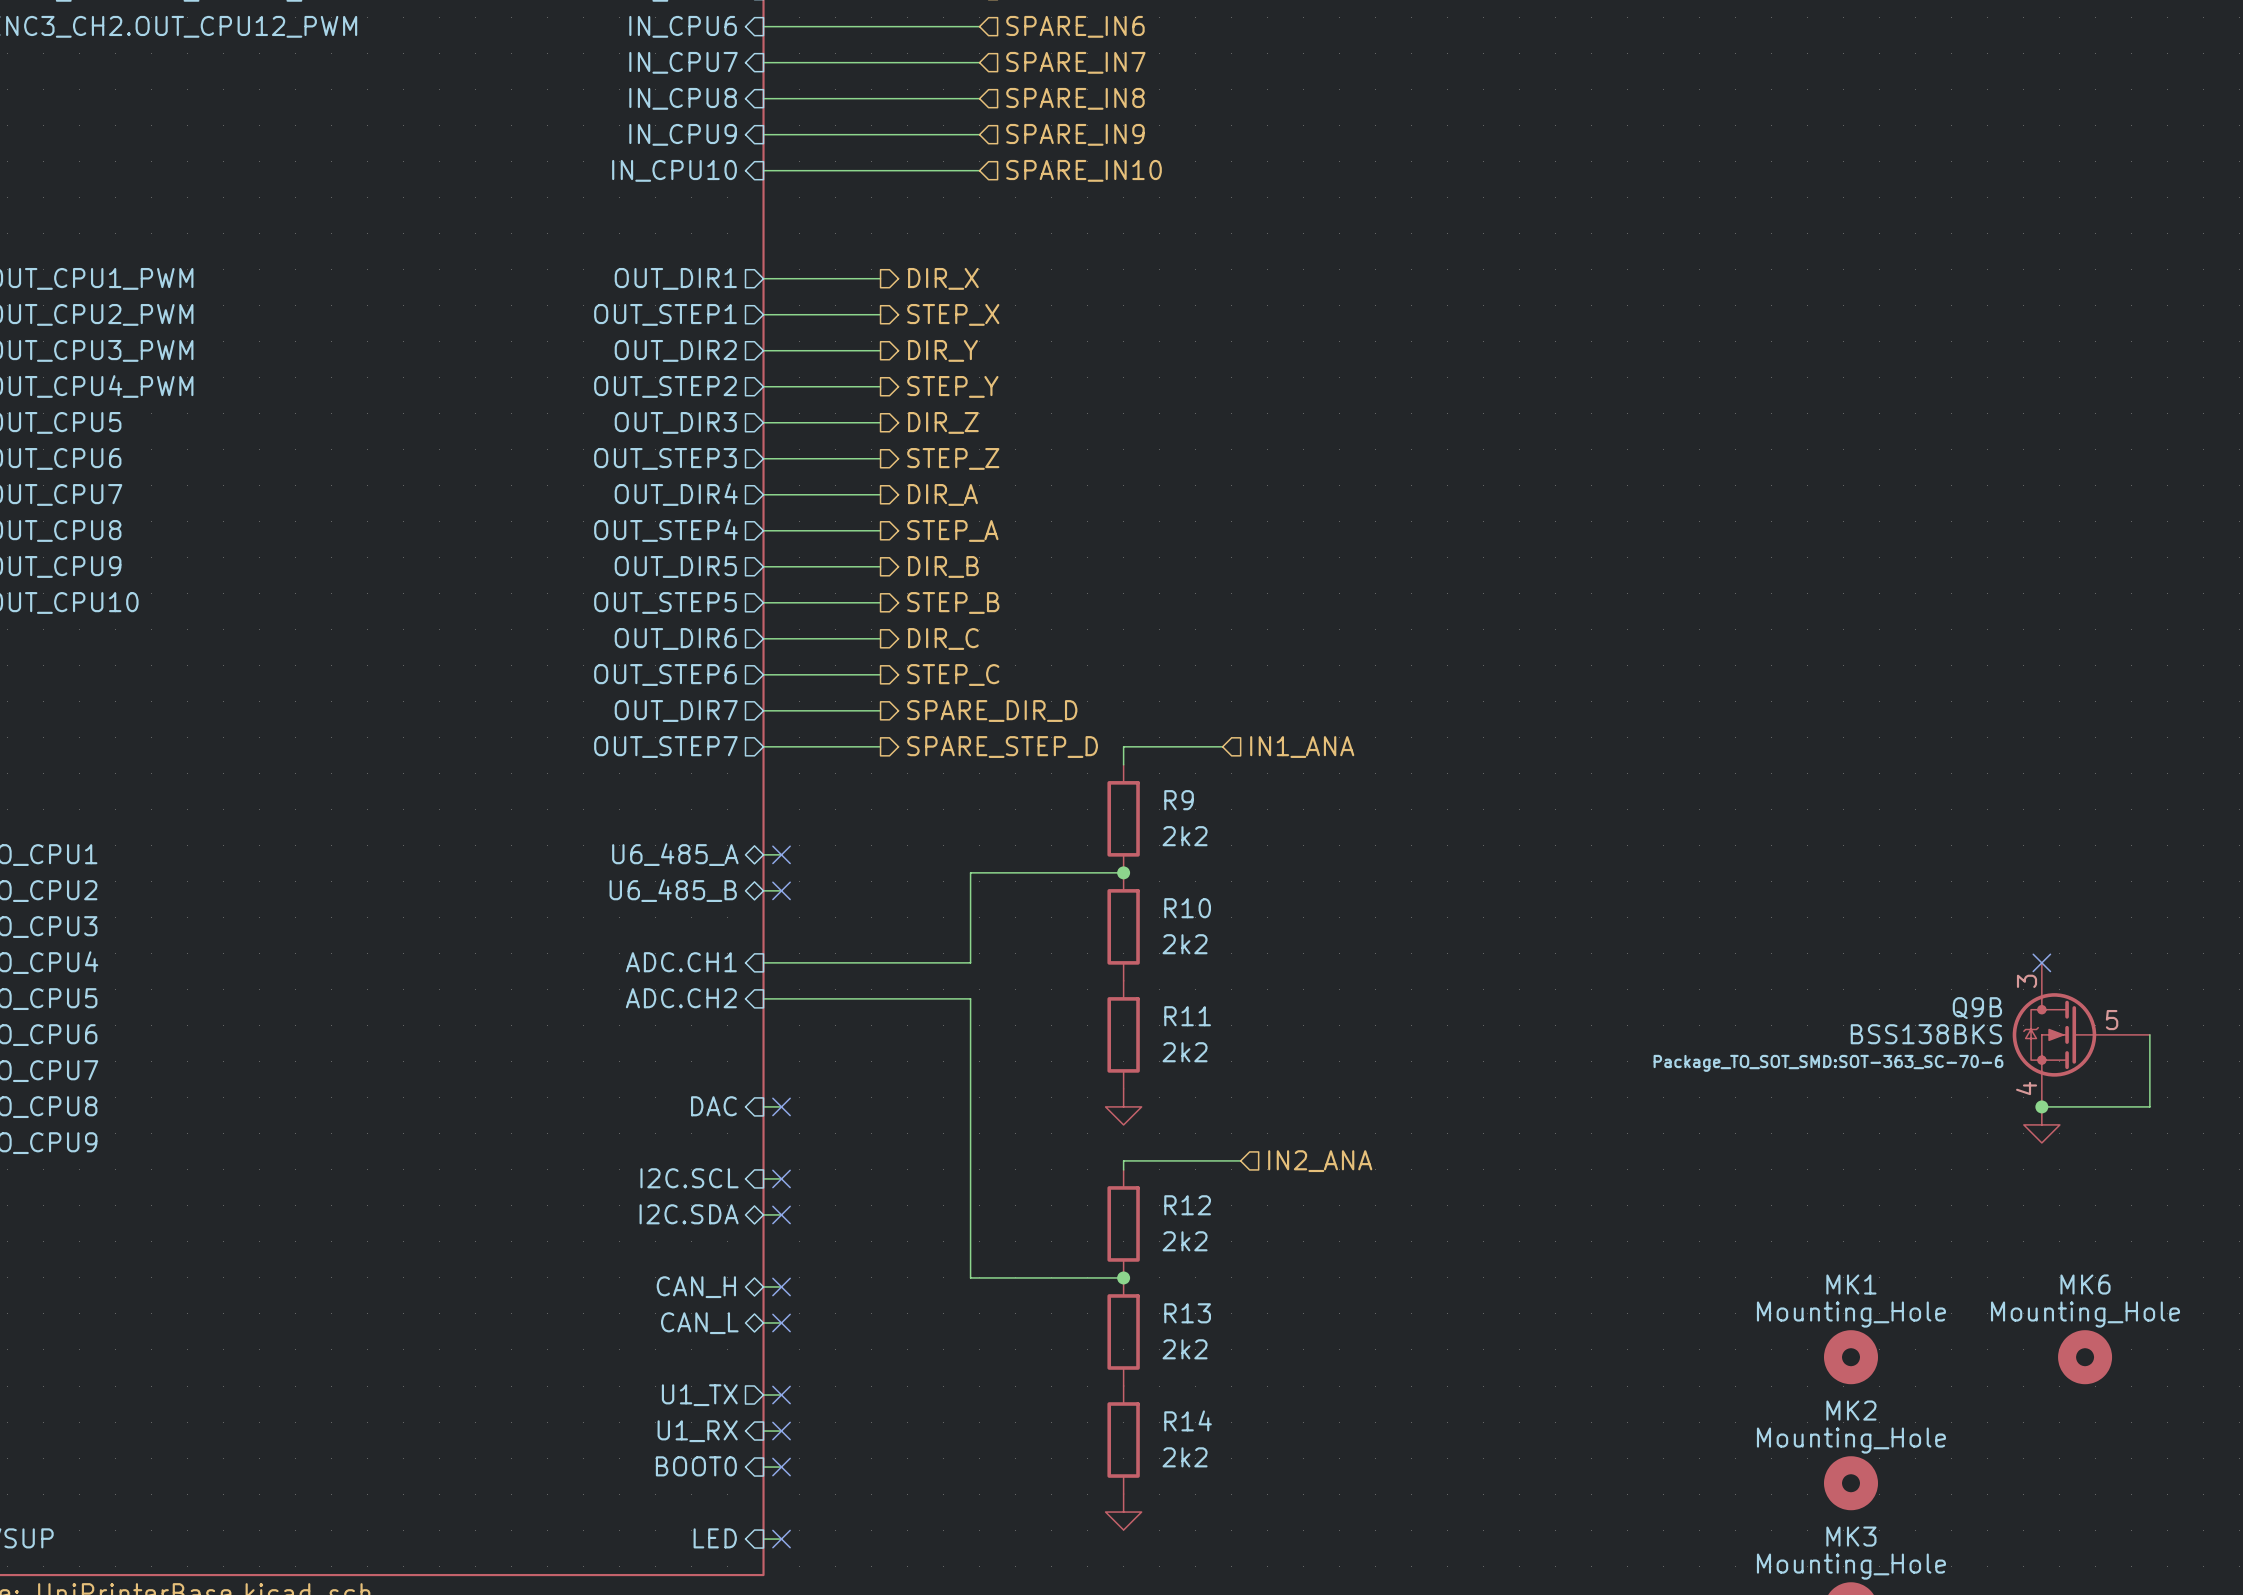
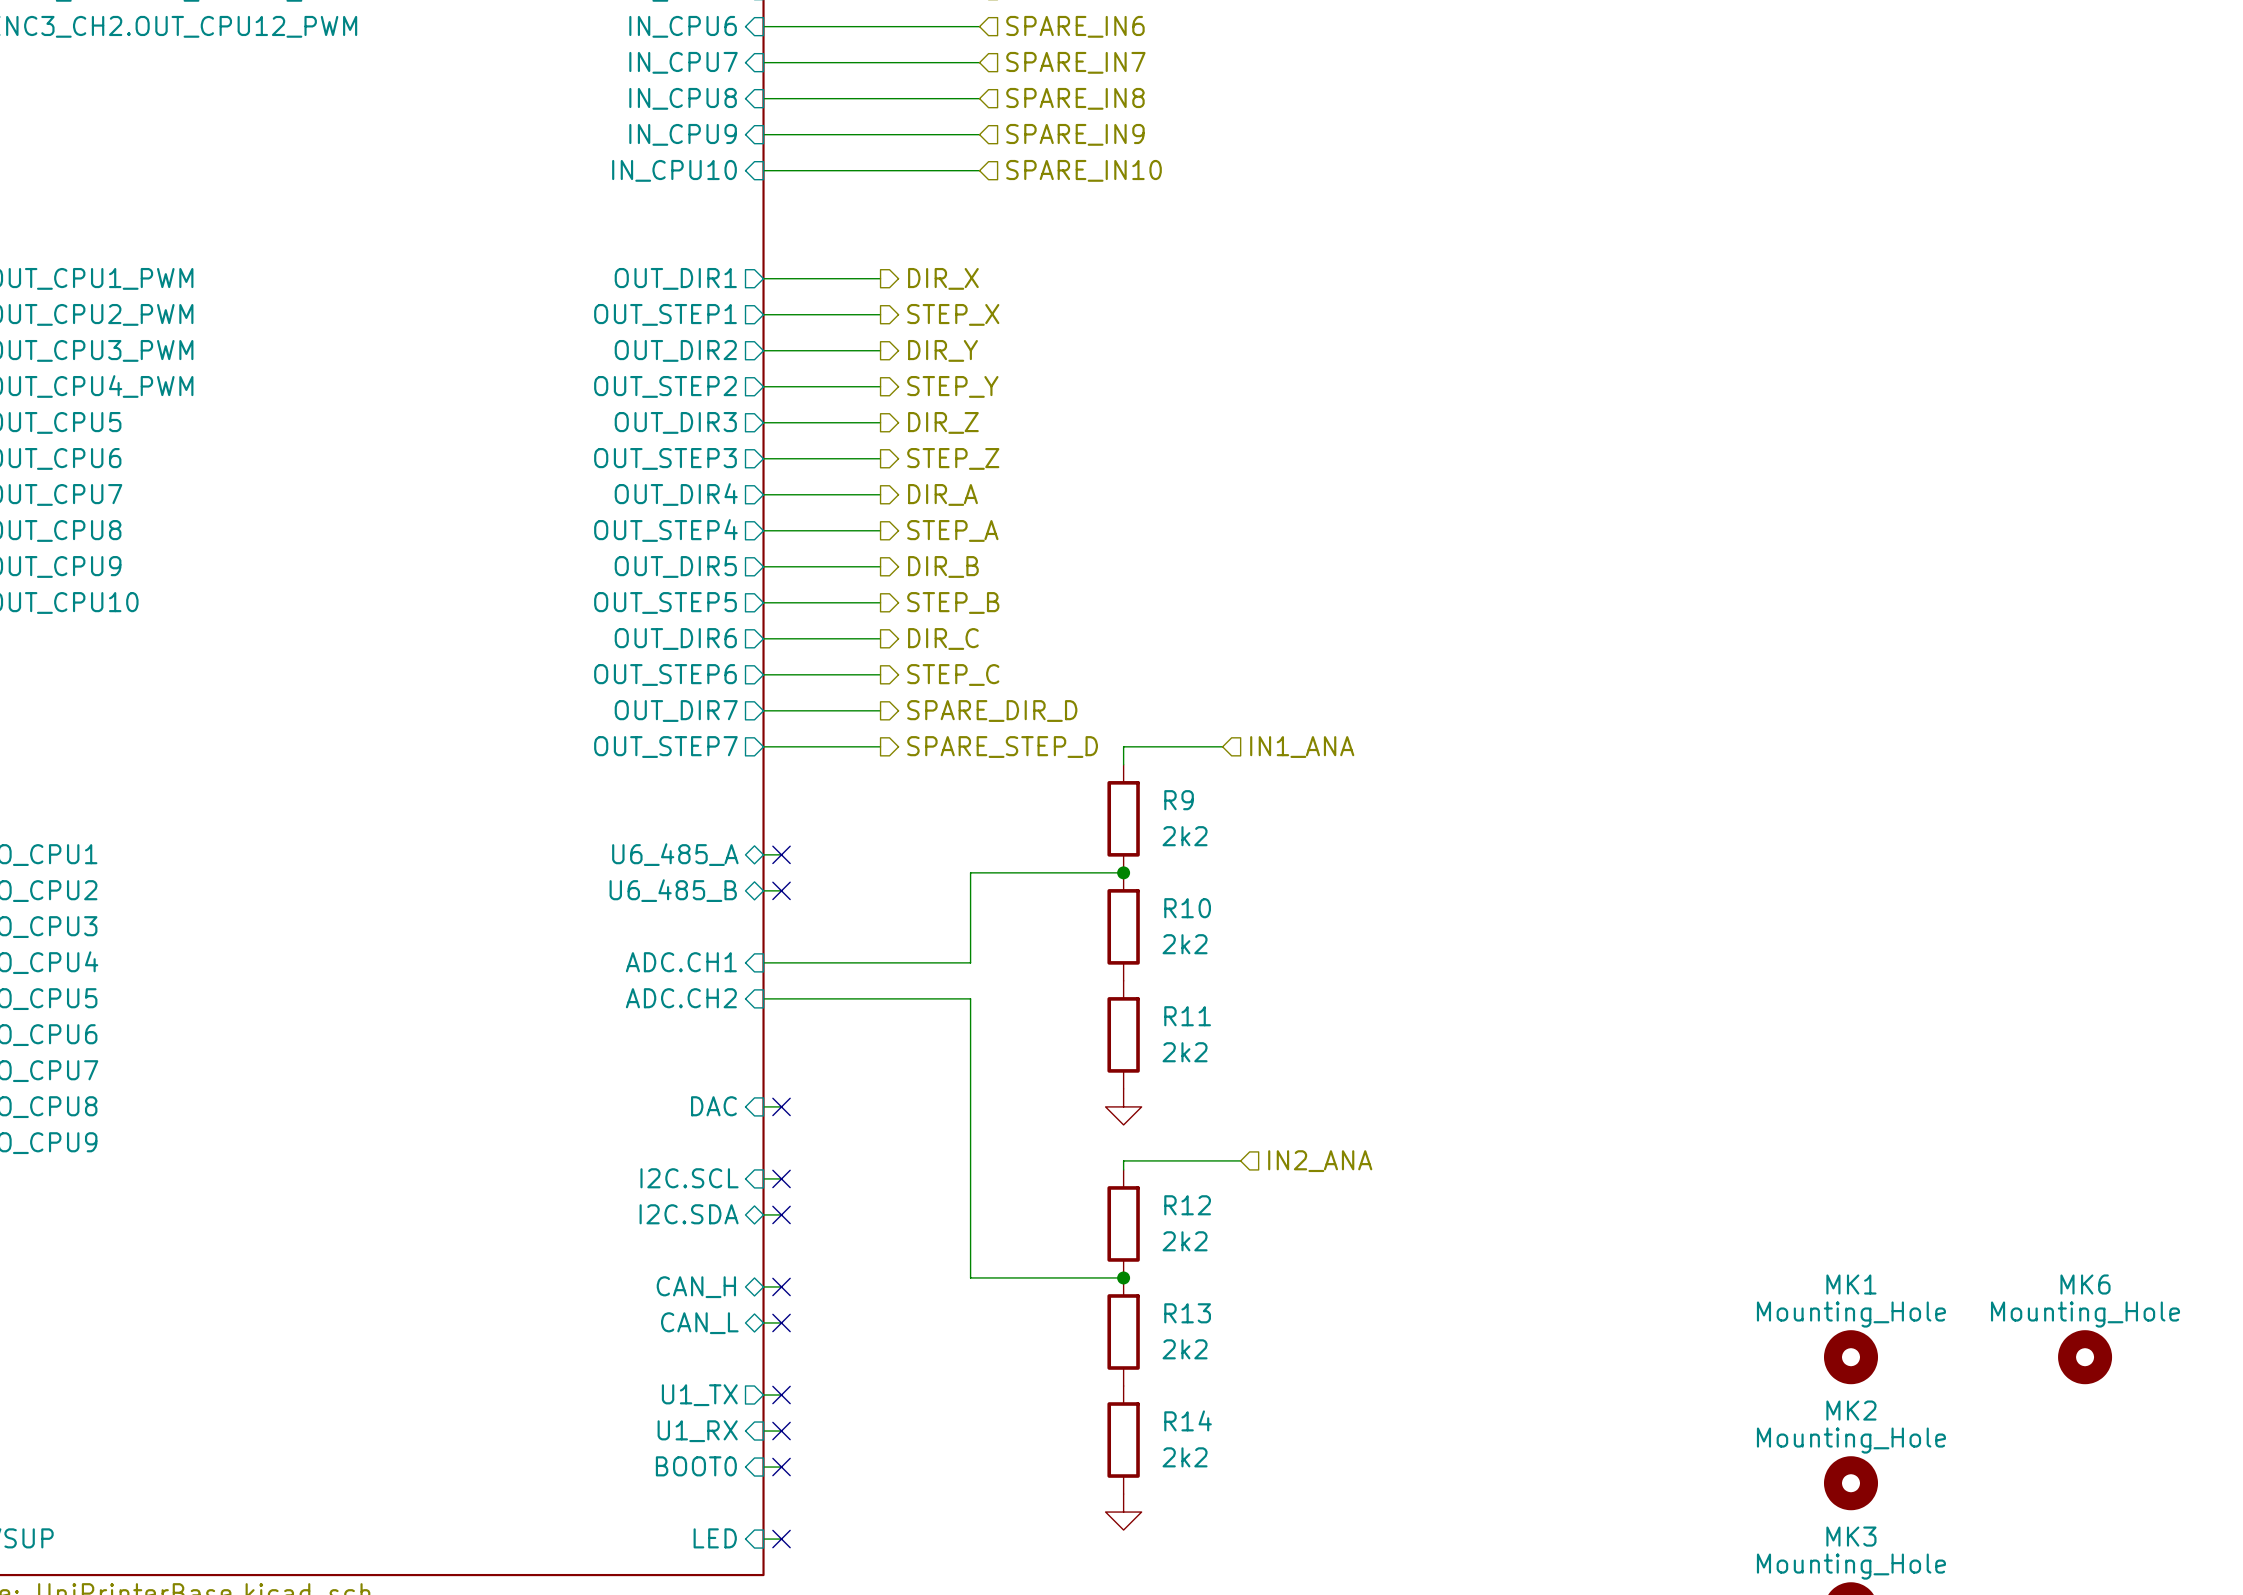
no-connect mark: (2041, 962) -> none
Q9B: BSS138BKS (2081, 1034) -> none
wire: (2149, 1034) (2149, 1106) (2041, 1106) -> none
junction: (2041, 1106) -> none
power symbol: (2041, 1124) -> none

